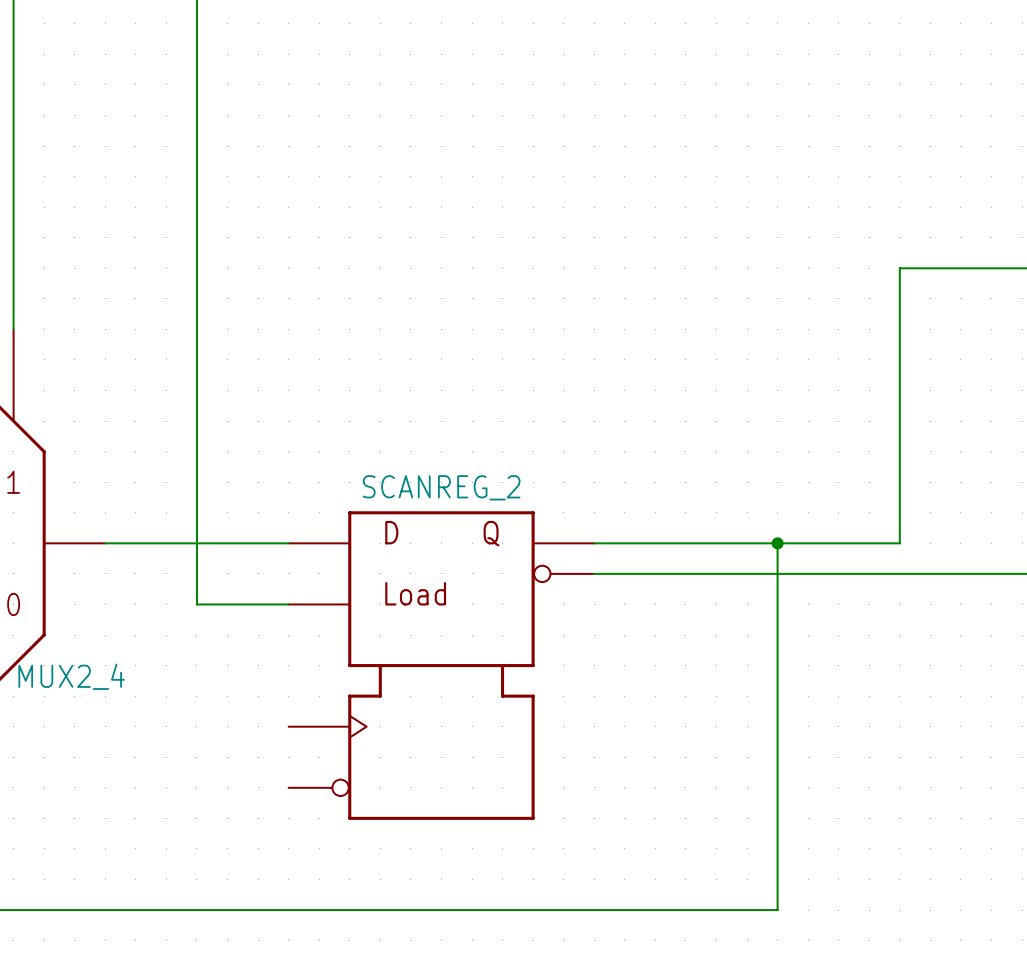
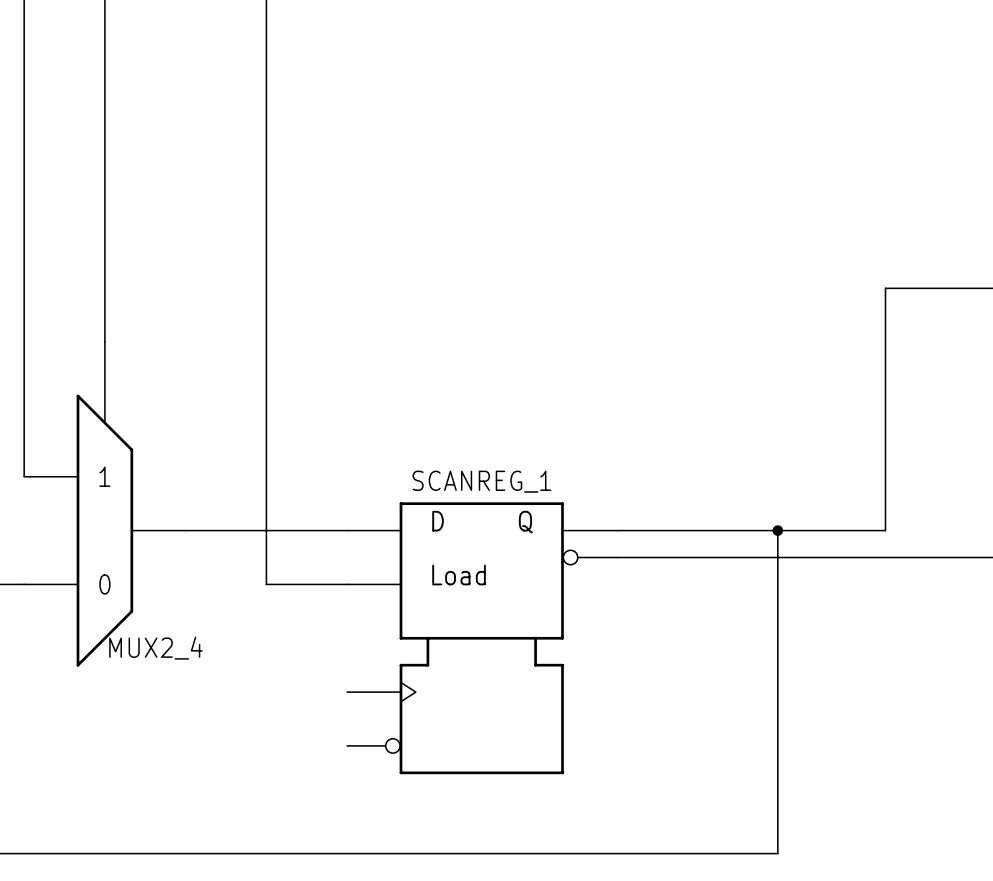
SCANREG_2 name: SCANREG_2 (441, 487) -> SCANREG_1 (481, 481)

